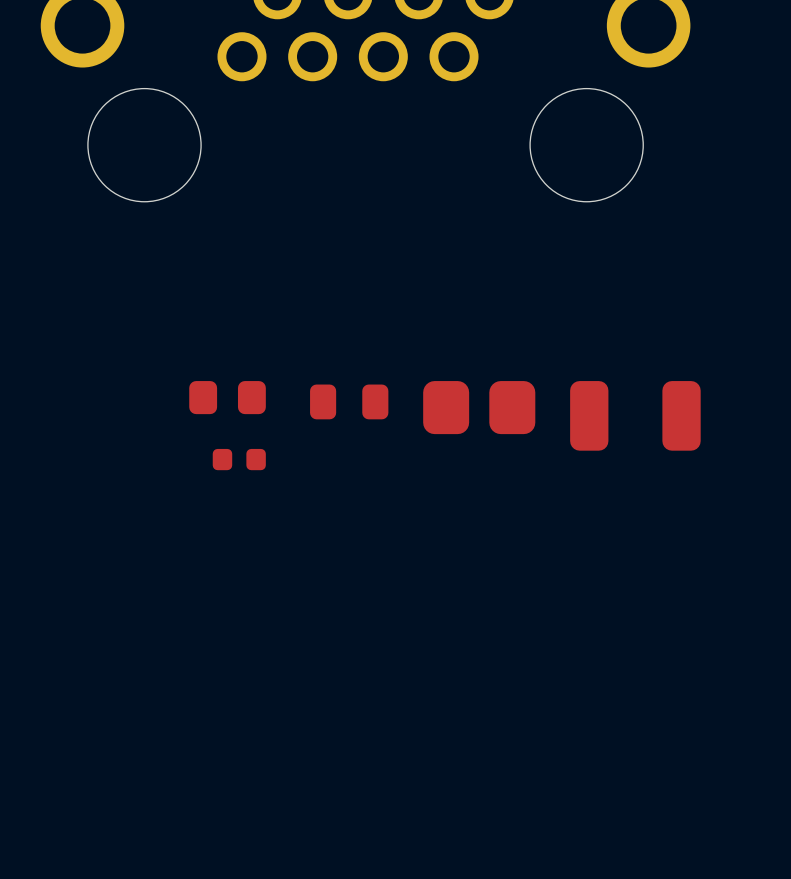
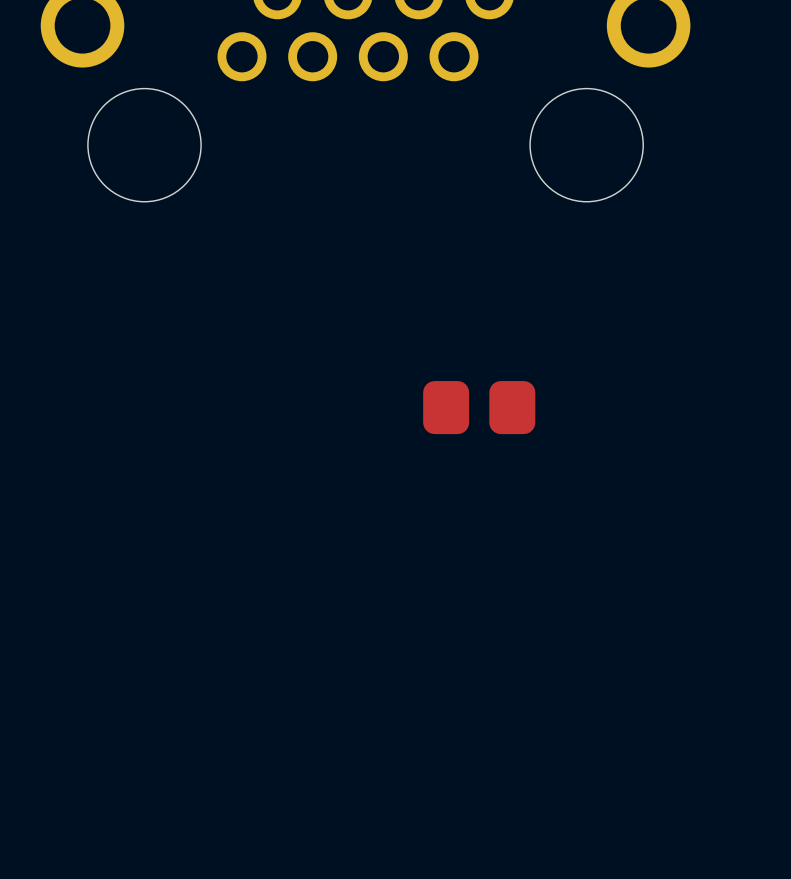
part: (227, 397) -> none
part: (349, 401) -> none
part: (635, 415) -> none
part: (239, 459) -> none

